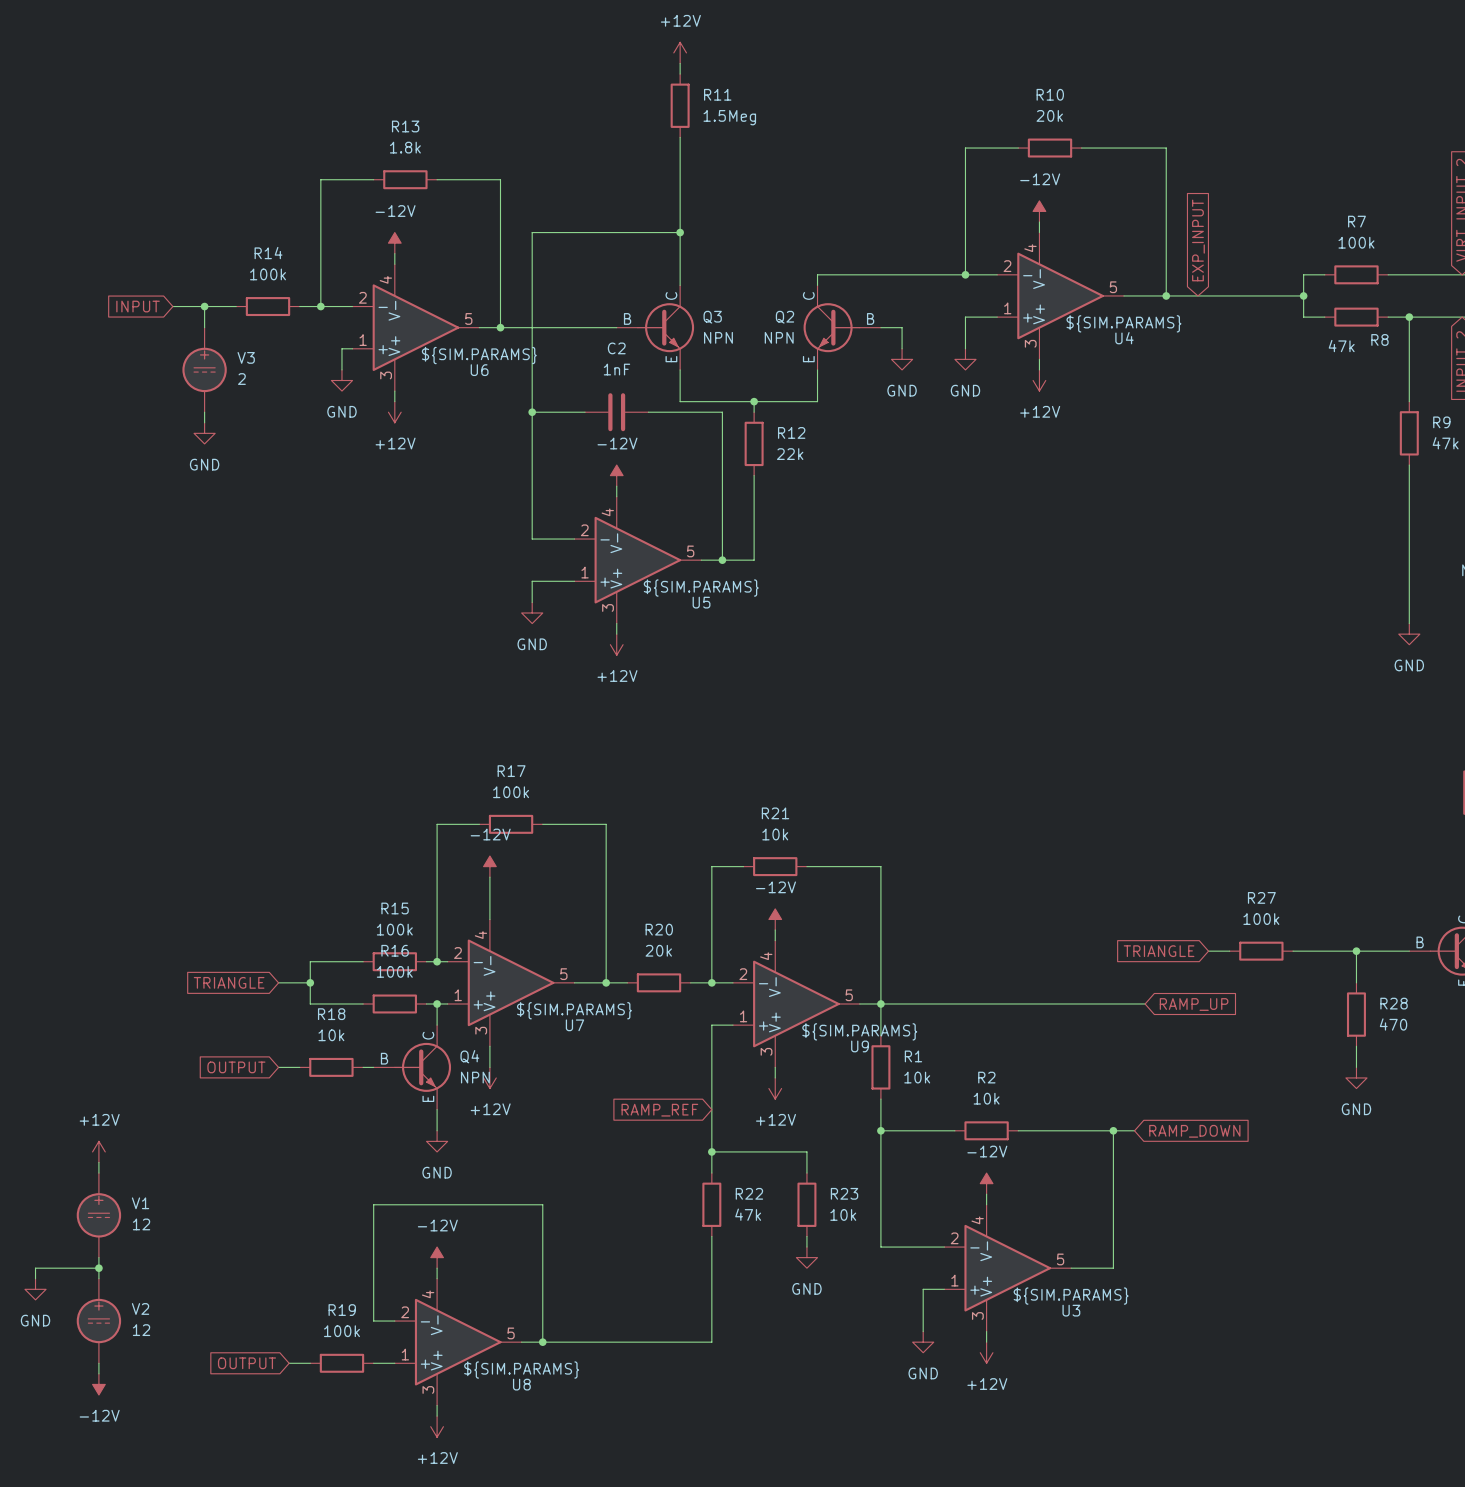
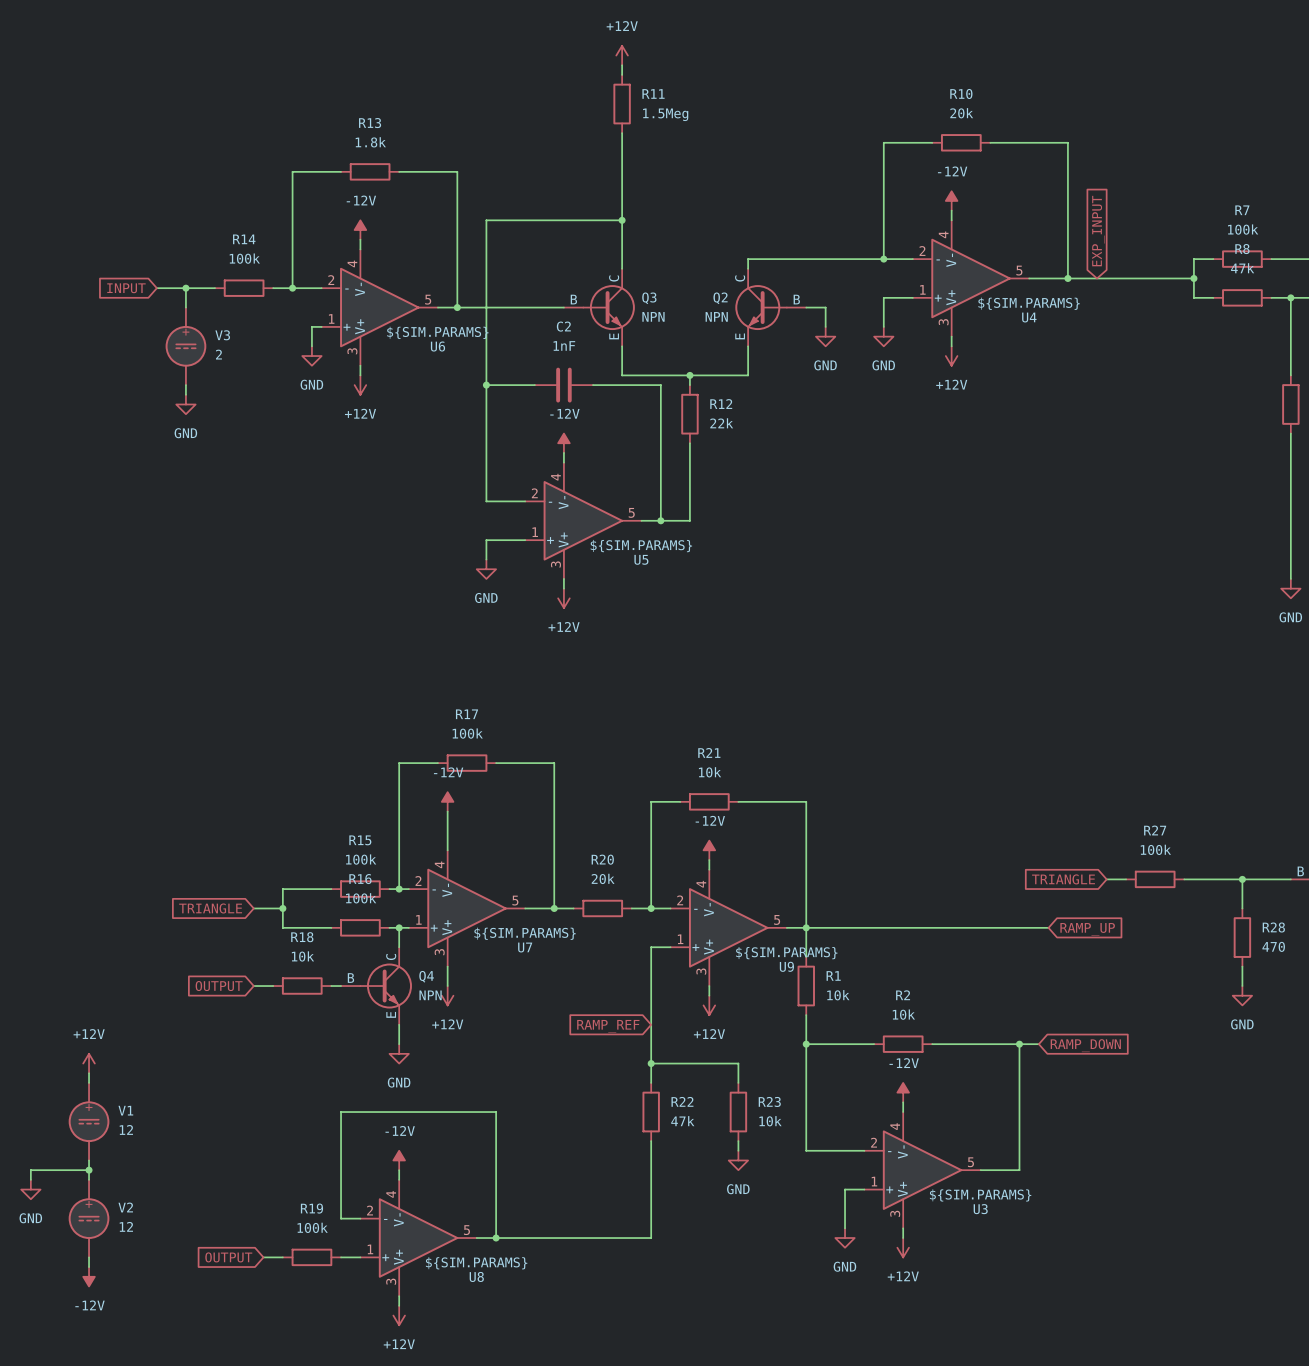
R8 name position: R8 (1379, 339) -> R8 (1242, 249)
R8 value position: 47k (1341, 346) -> 47k (1242, 268)

